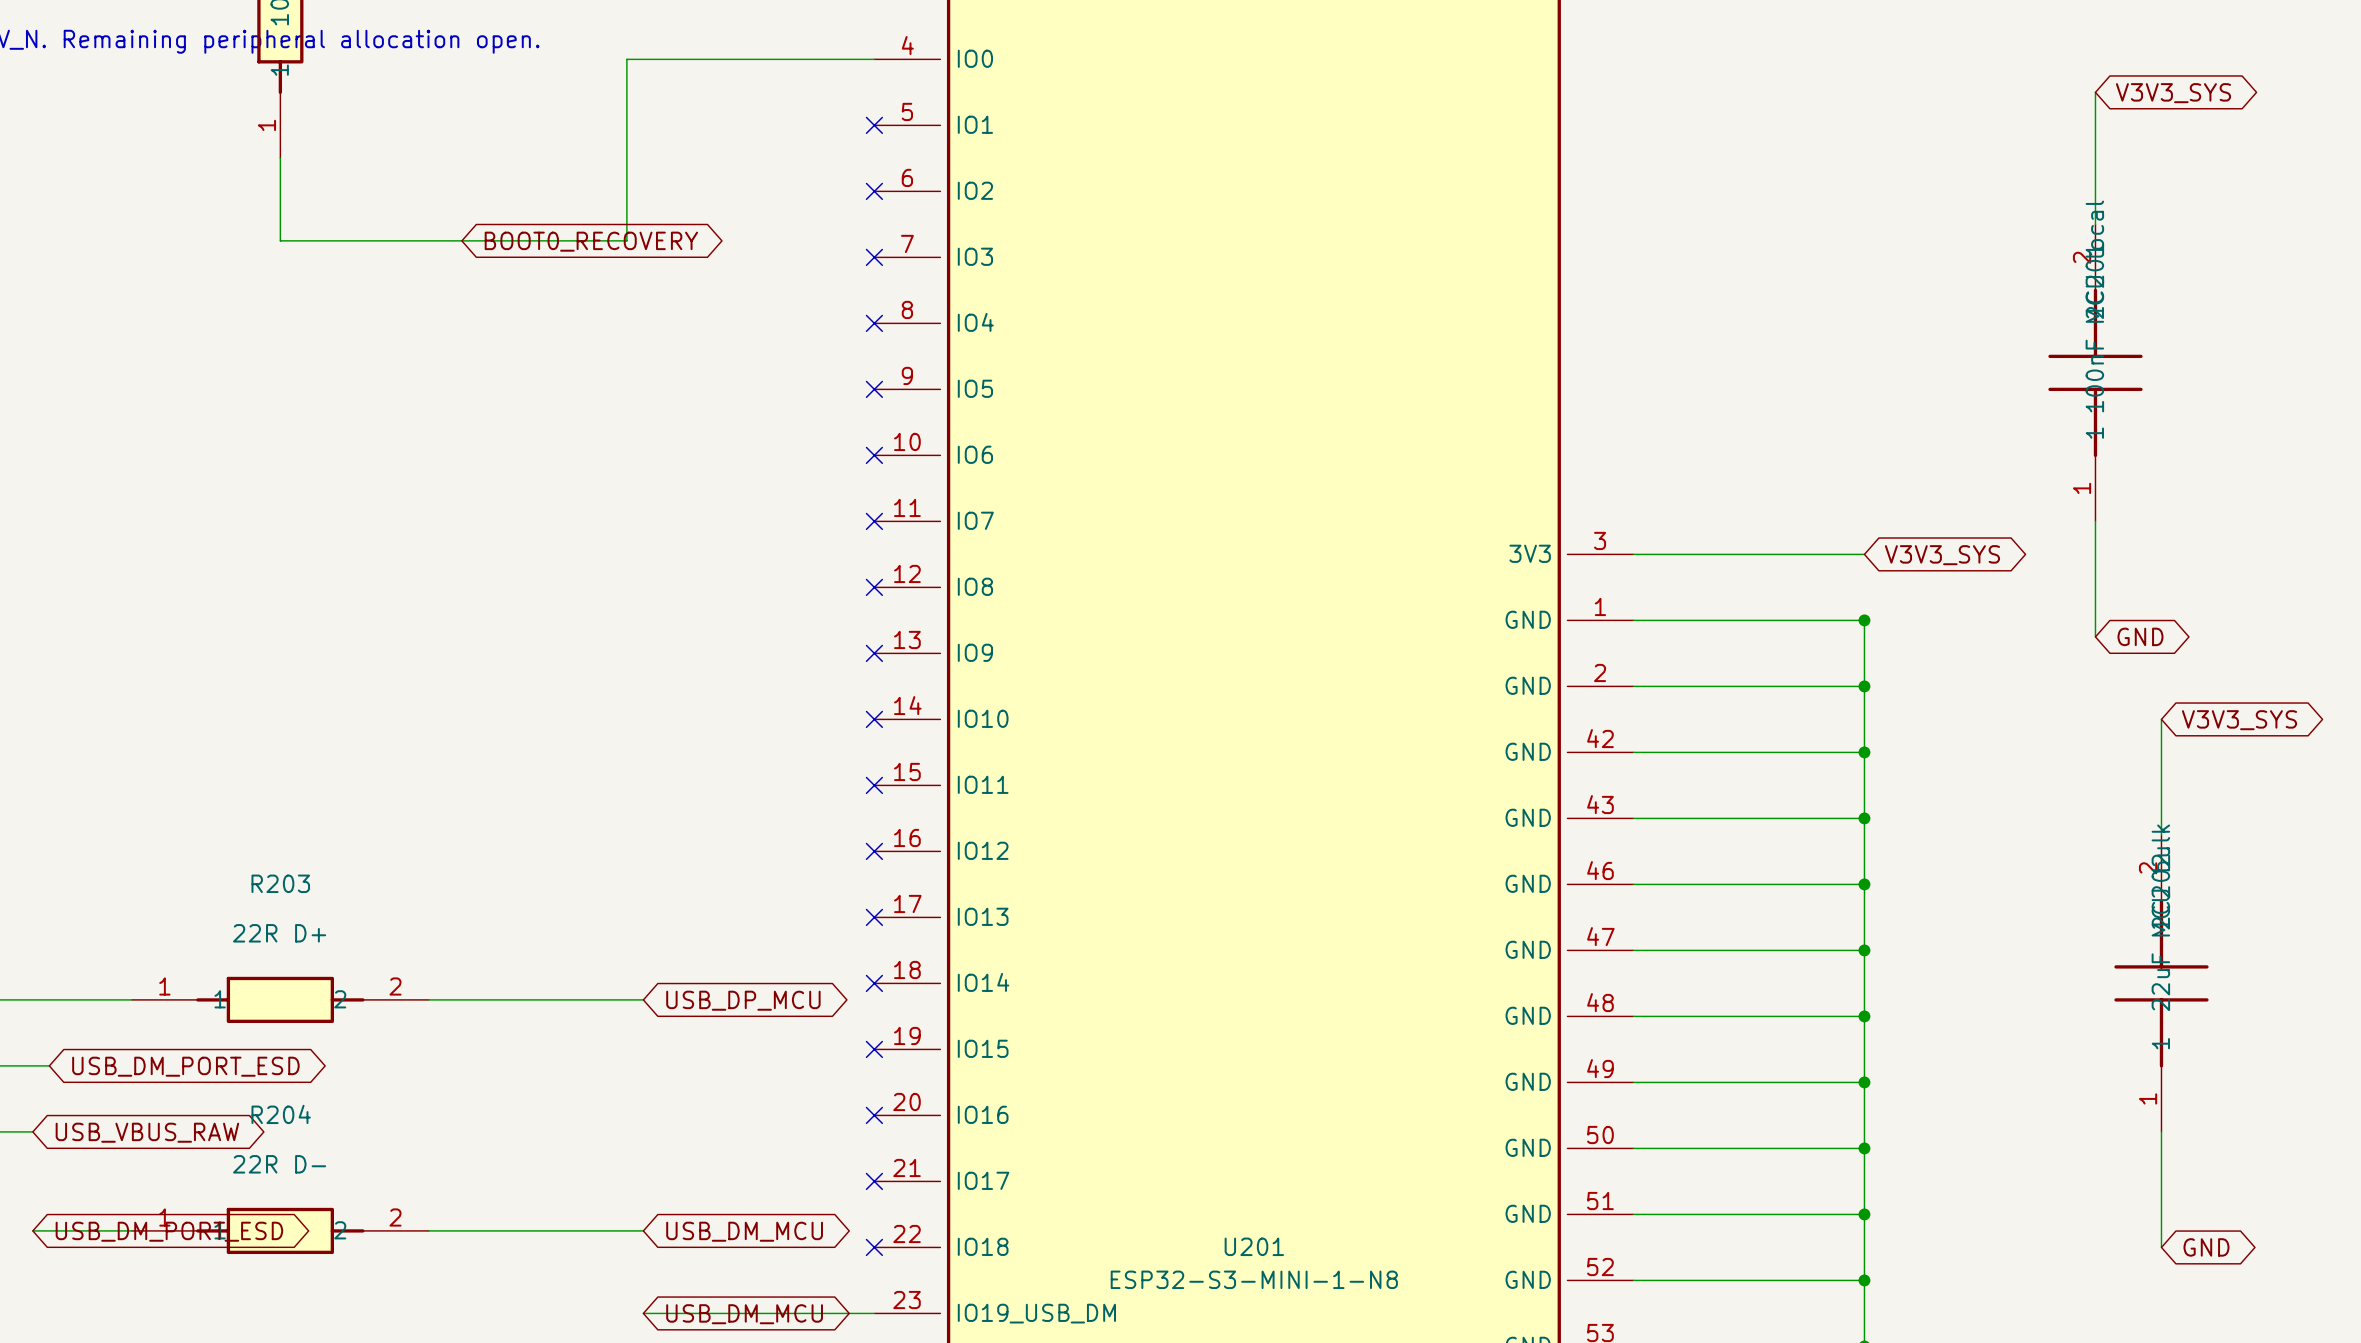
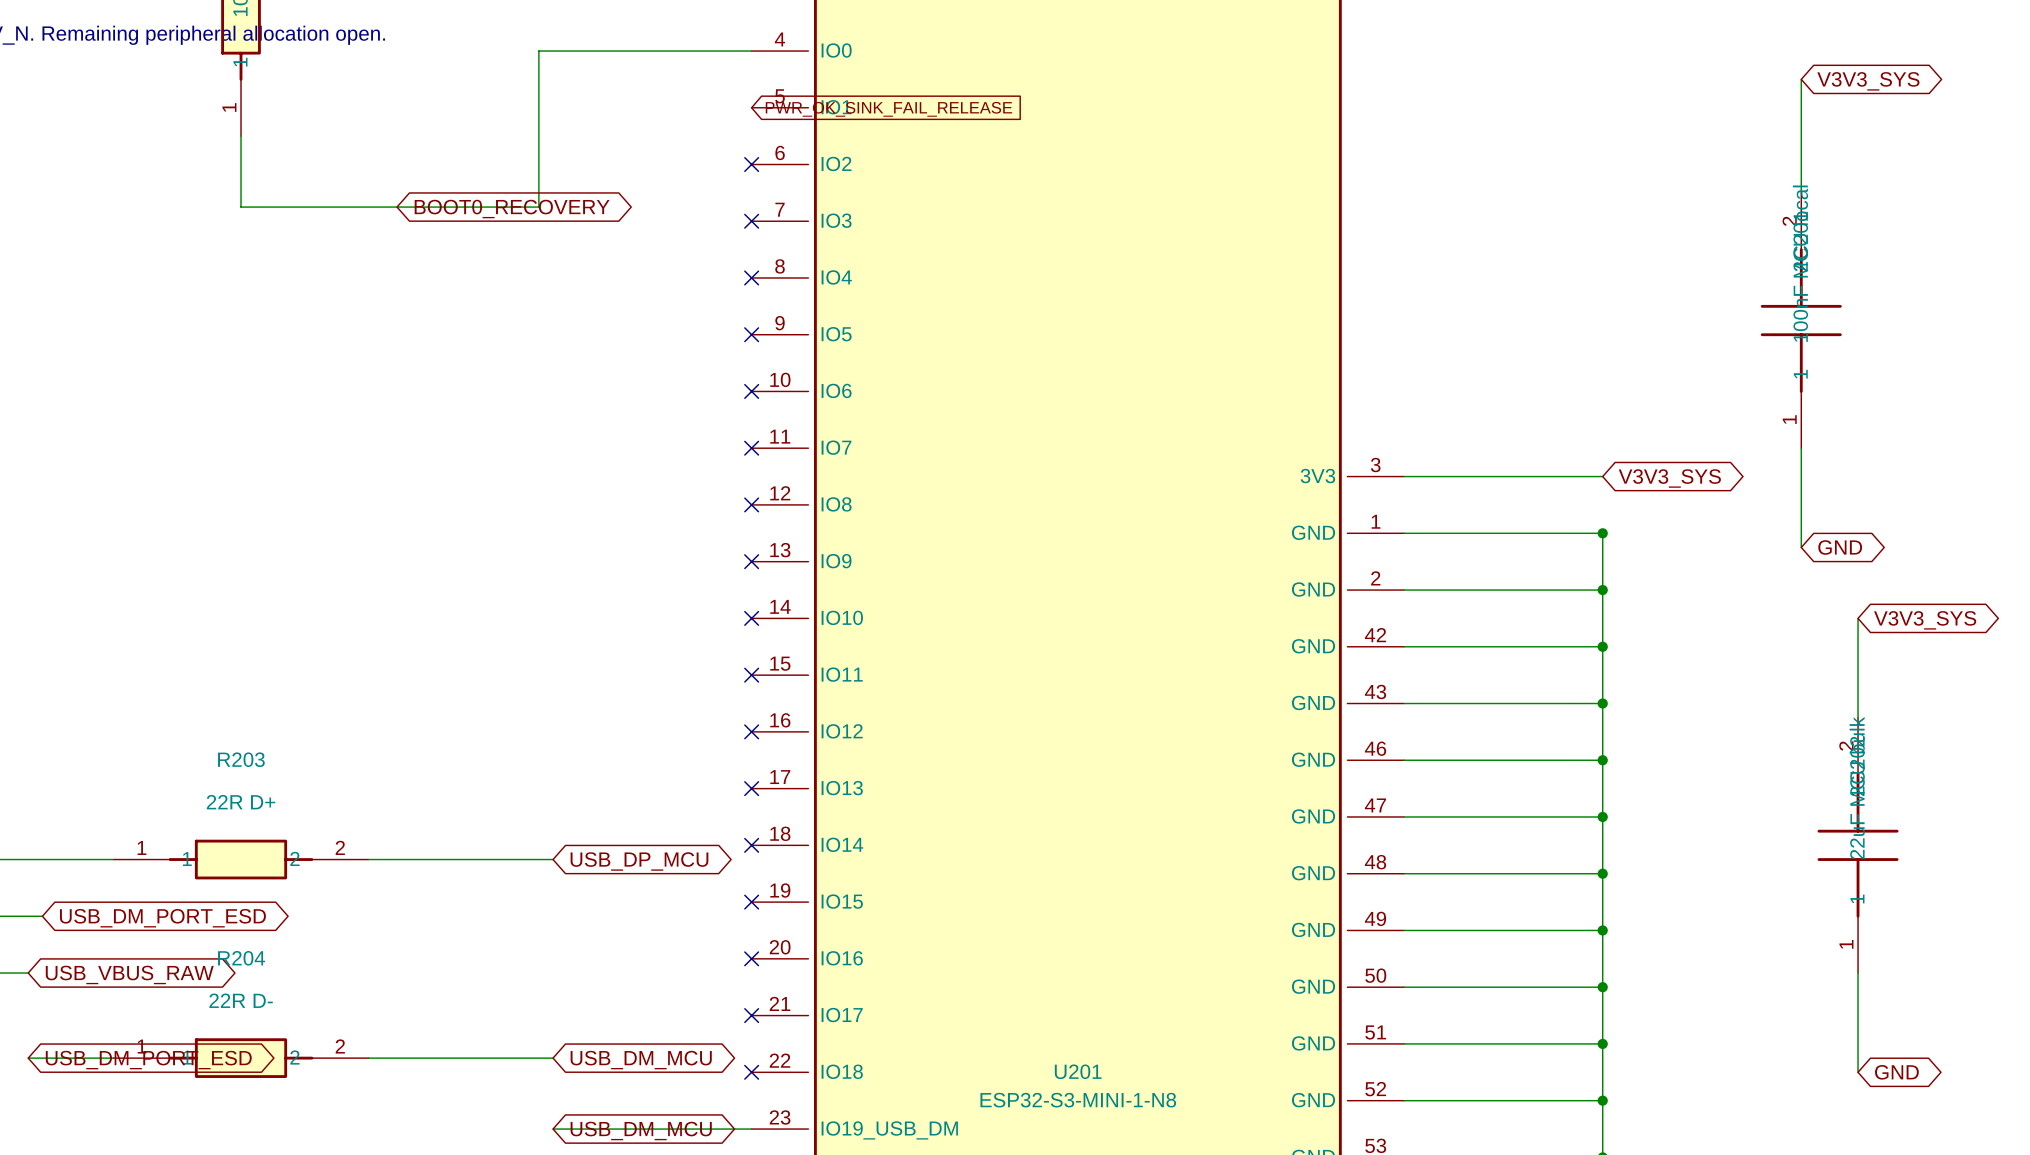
no-connect mark: (874, 125) -> none
global label: none -> PWR_OK_SINK_FAIL_RELEASE (888, 109)

